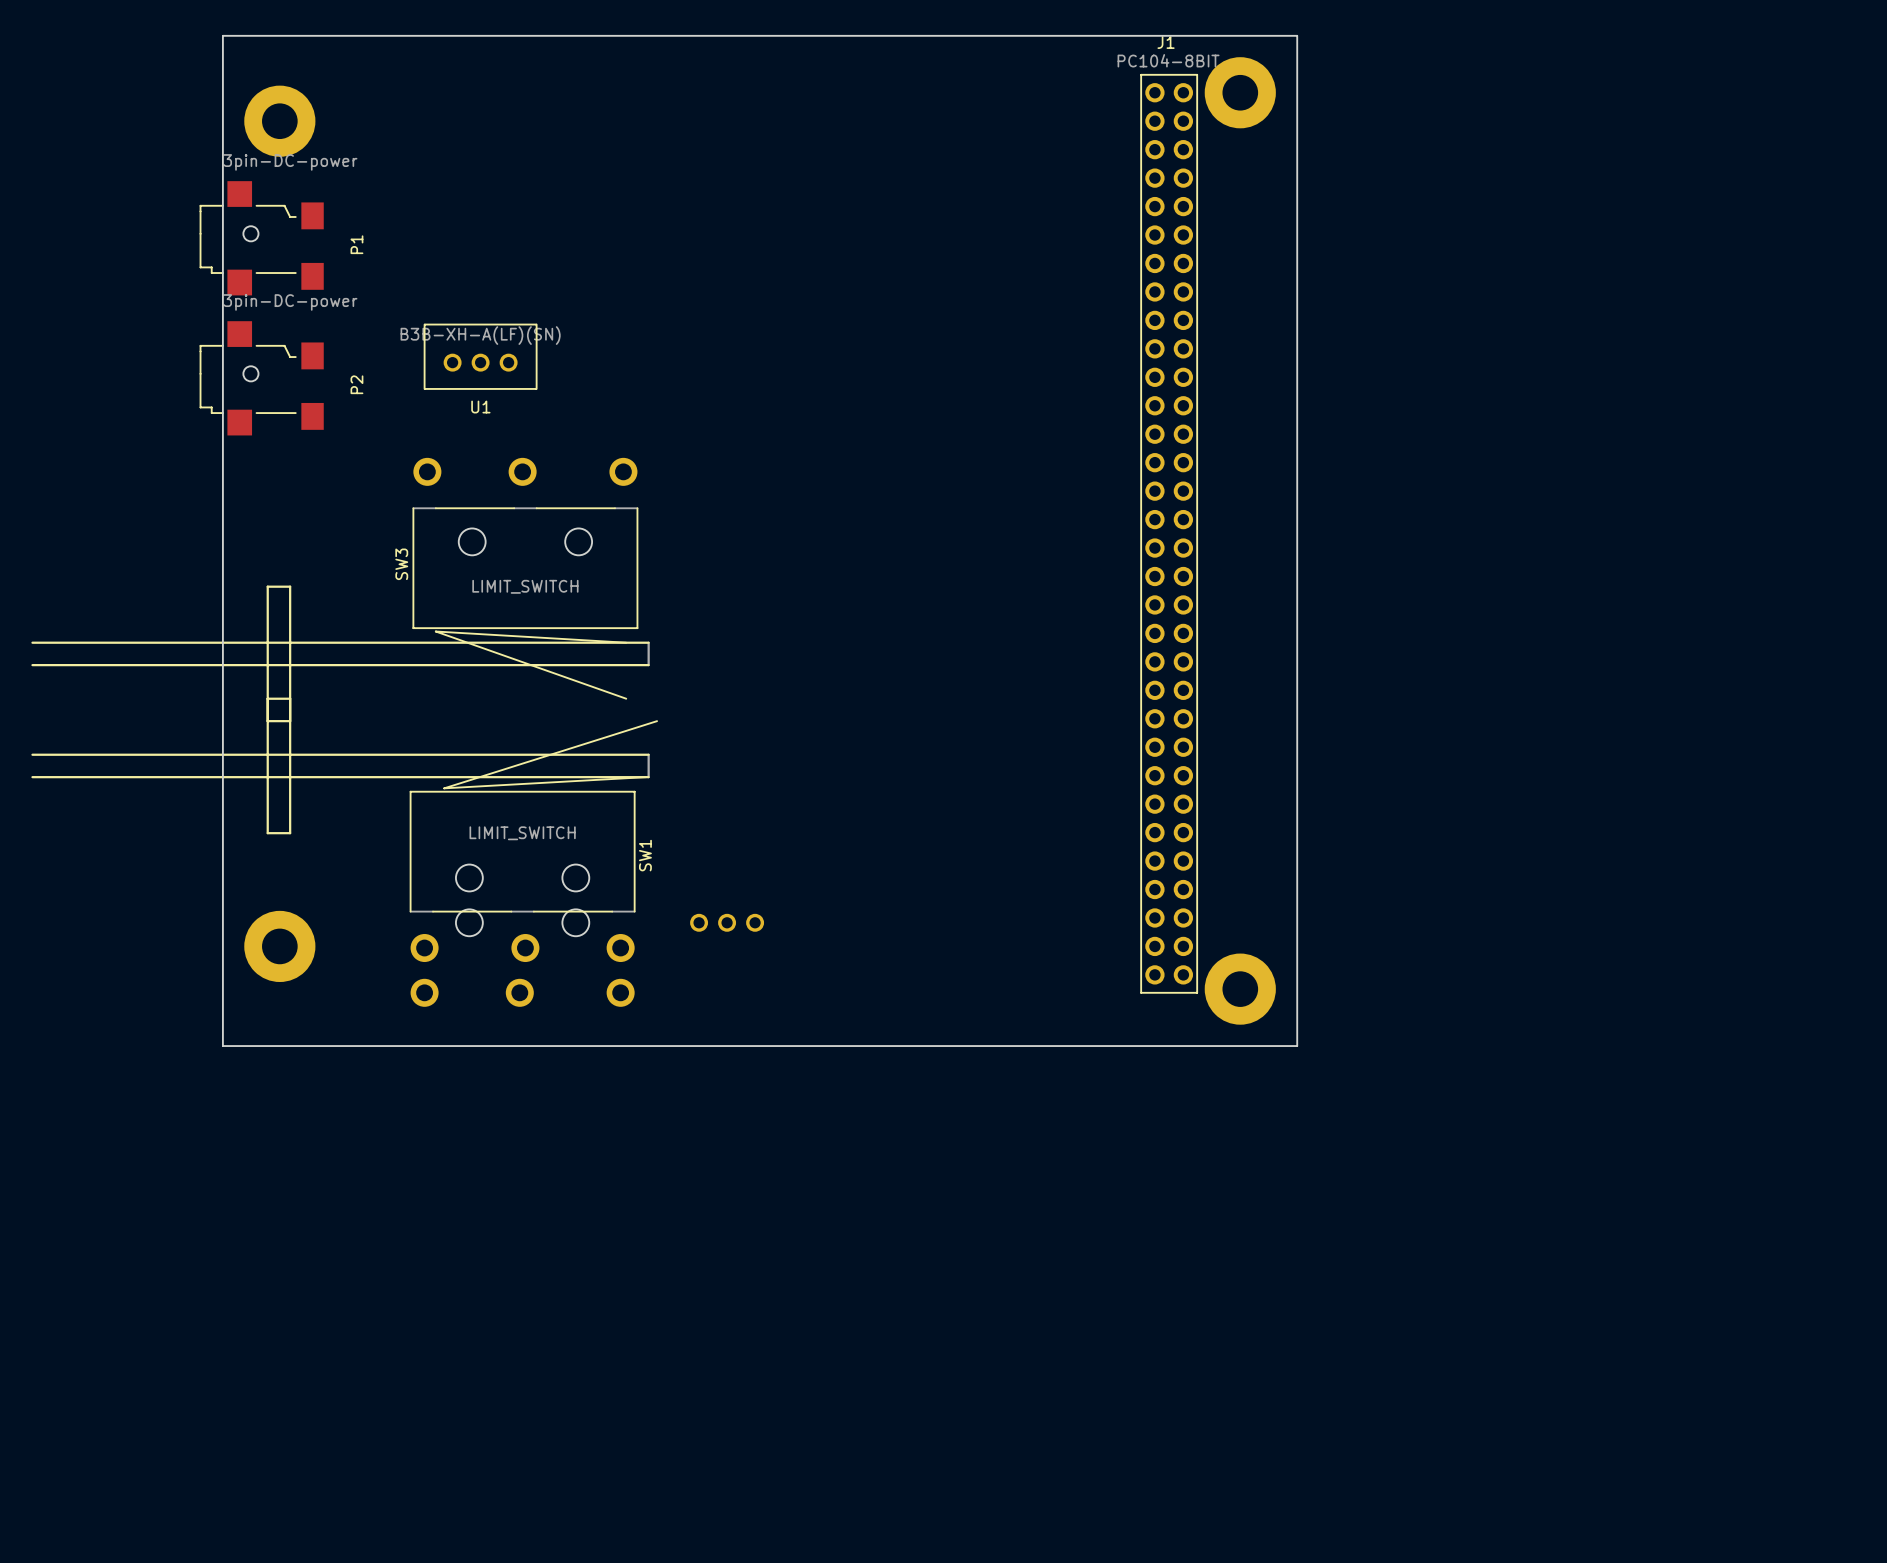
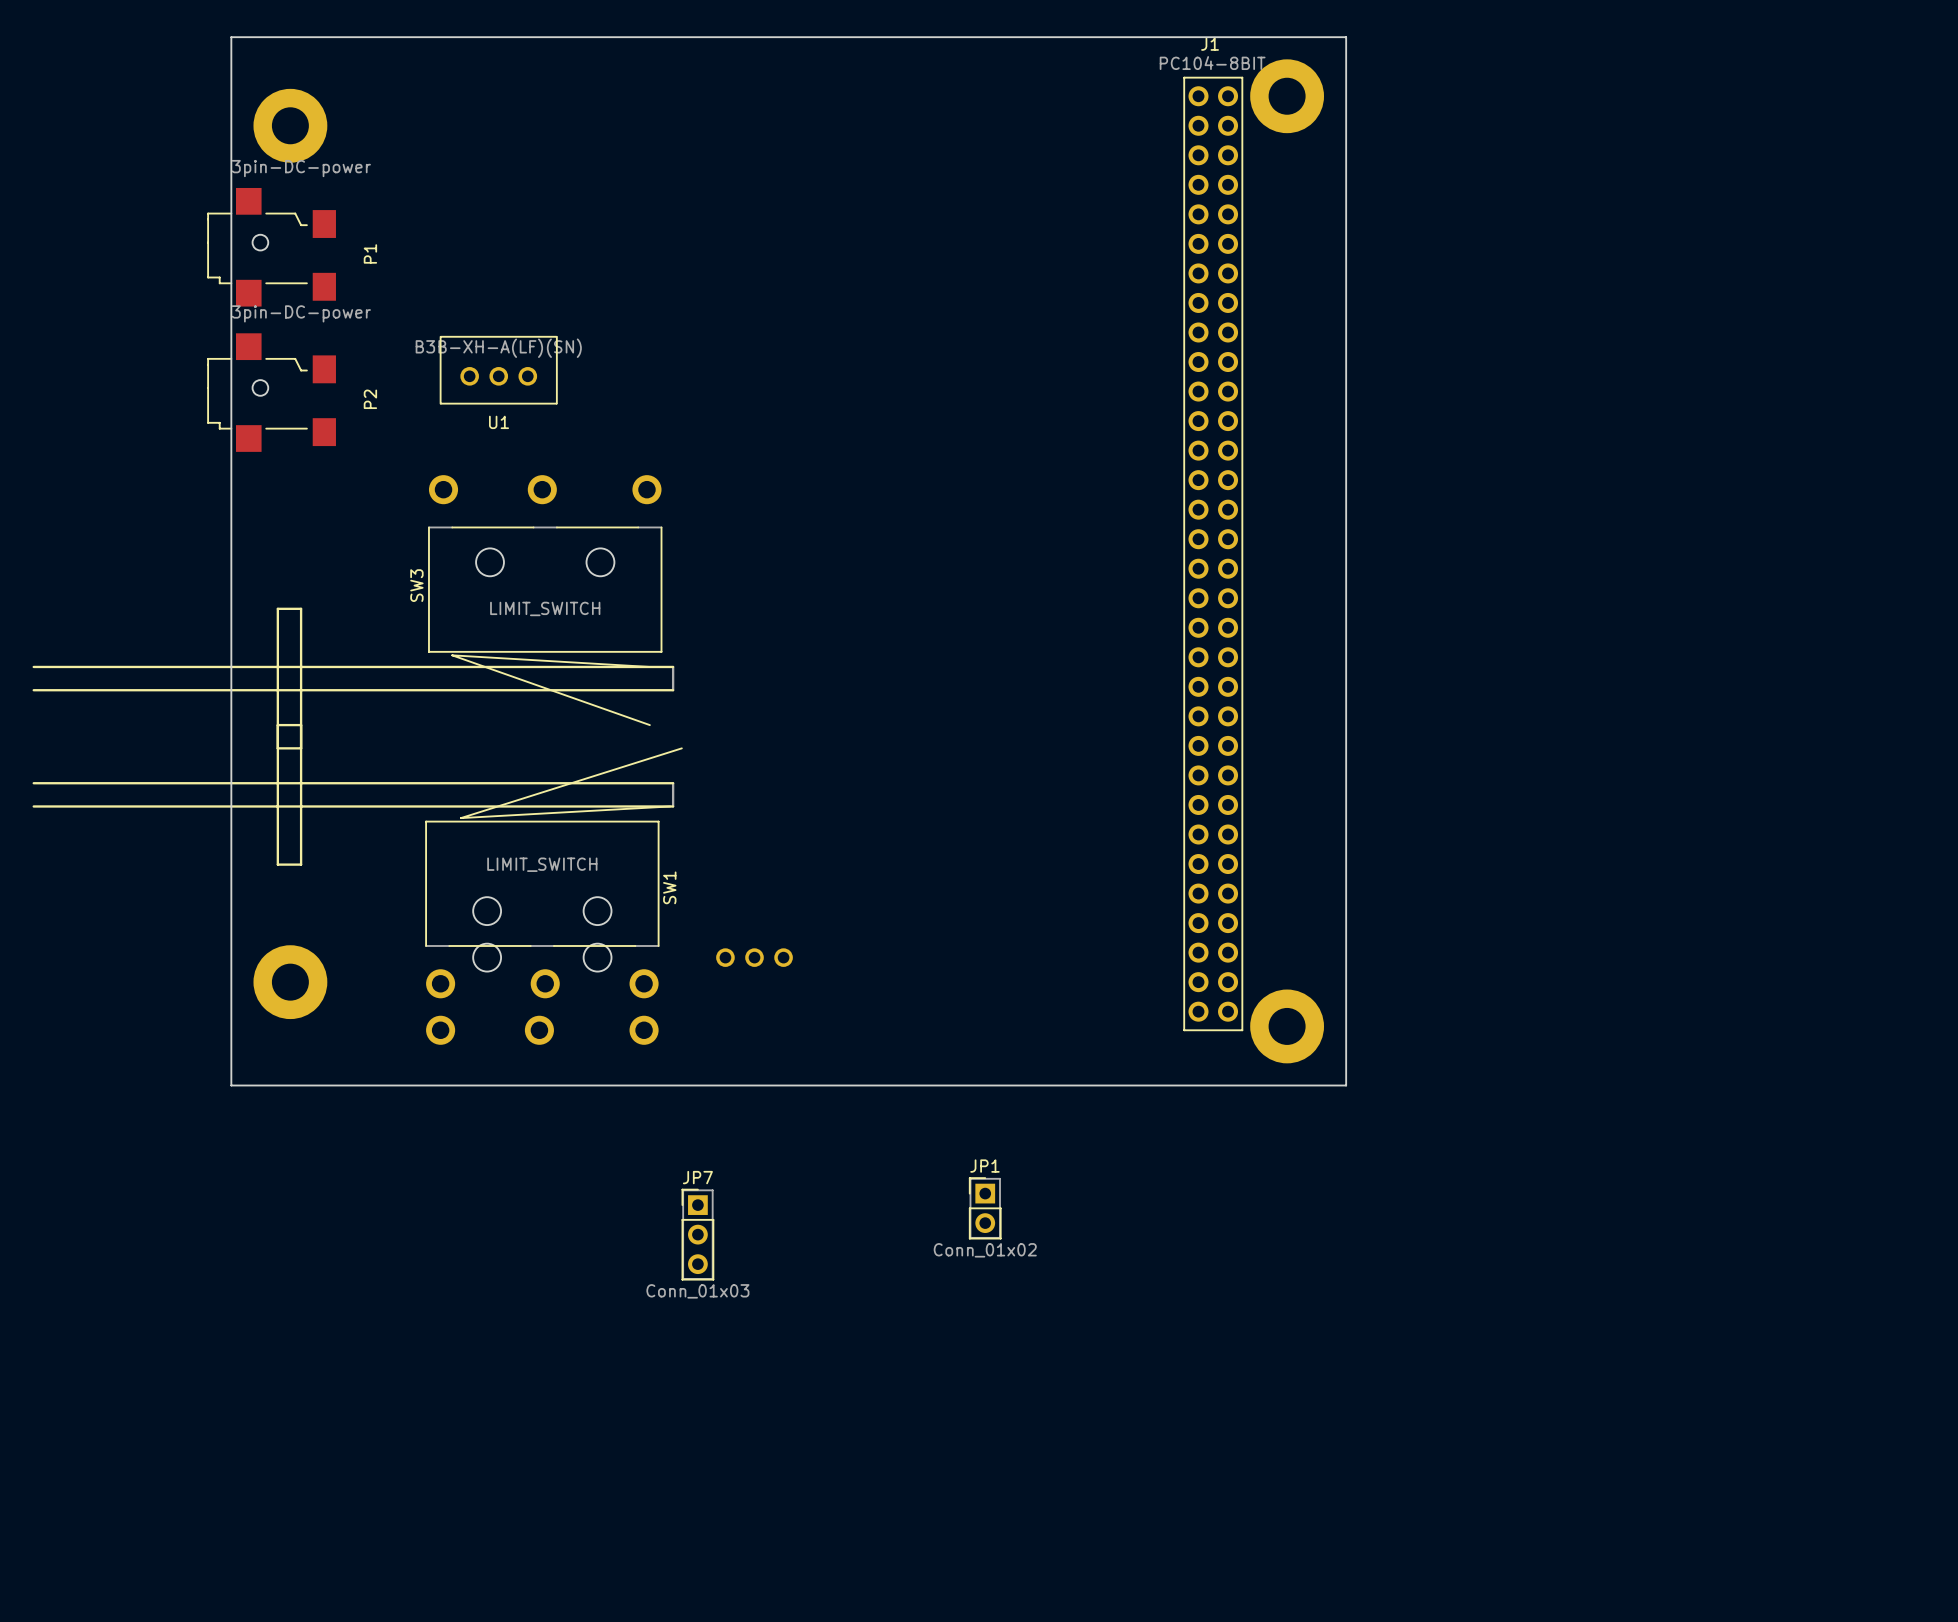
JP1: none -> Conn_01x02 (985, 1208)
JP7: none -> Conn_01x03 (697, 1234)

